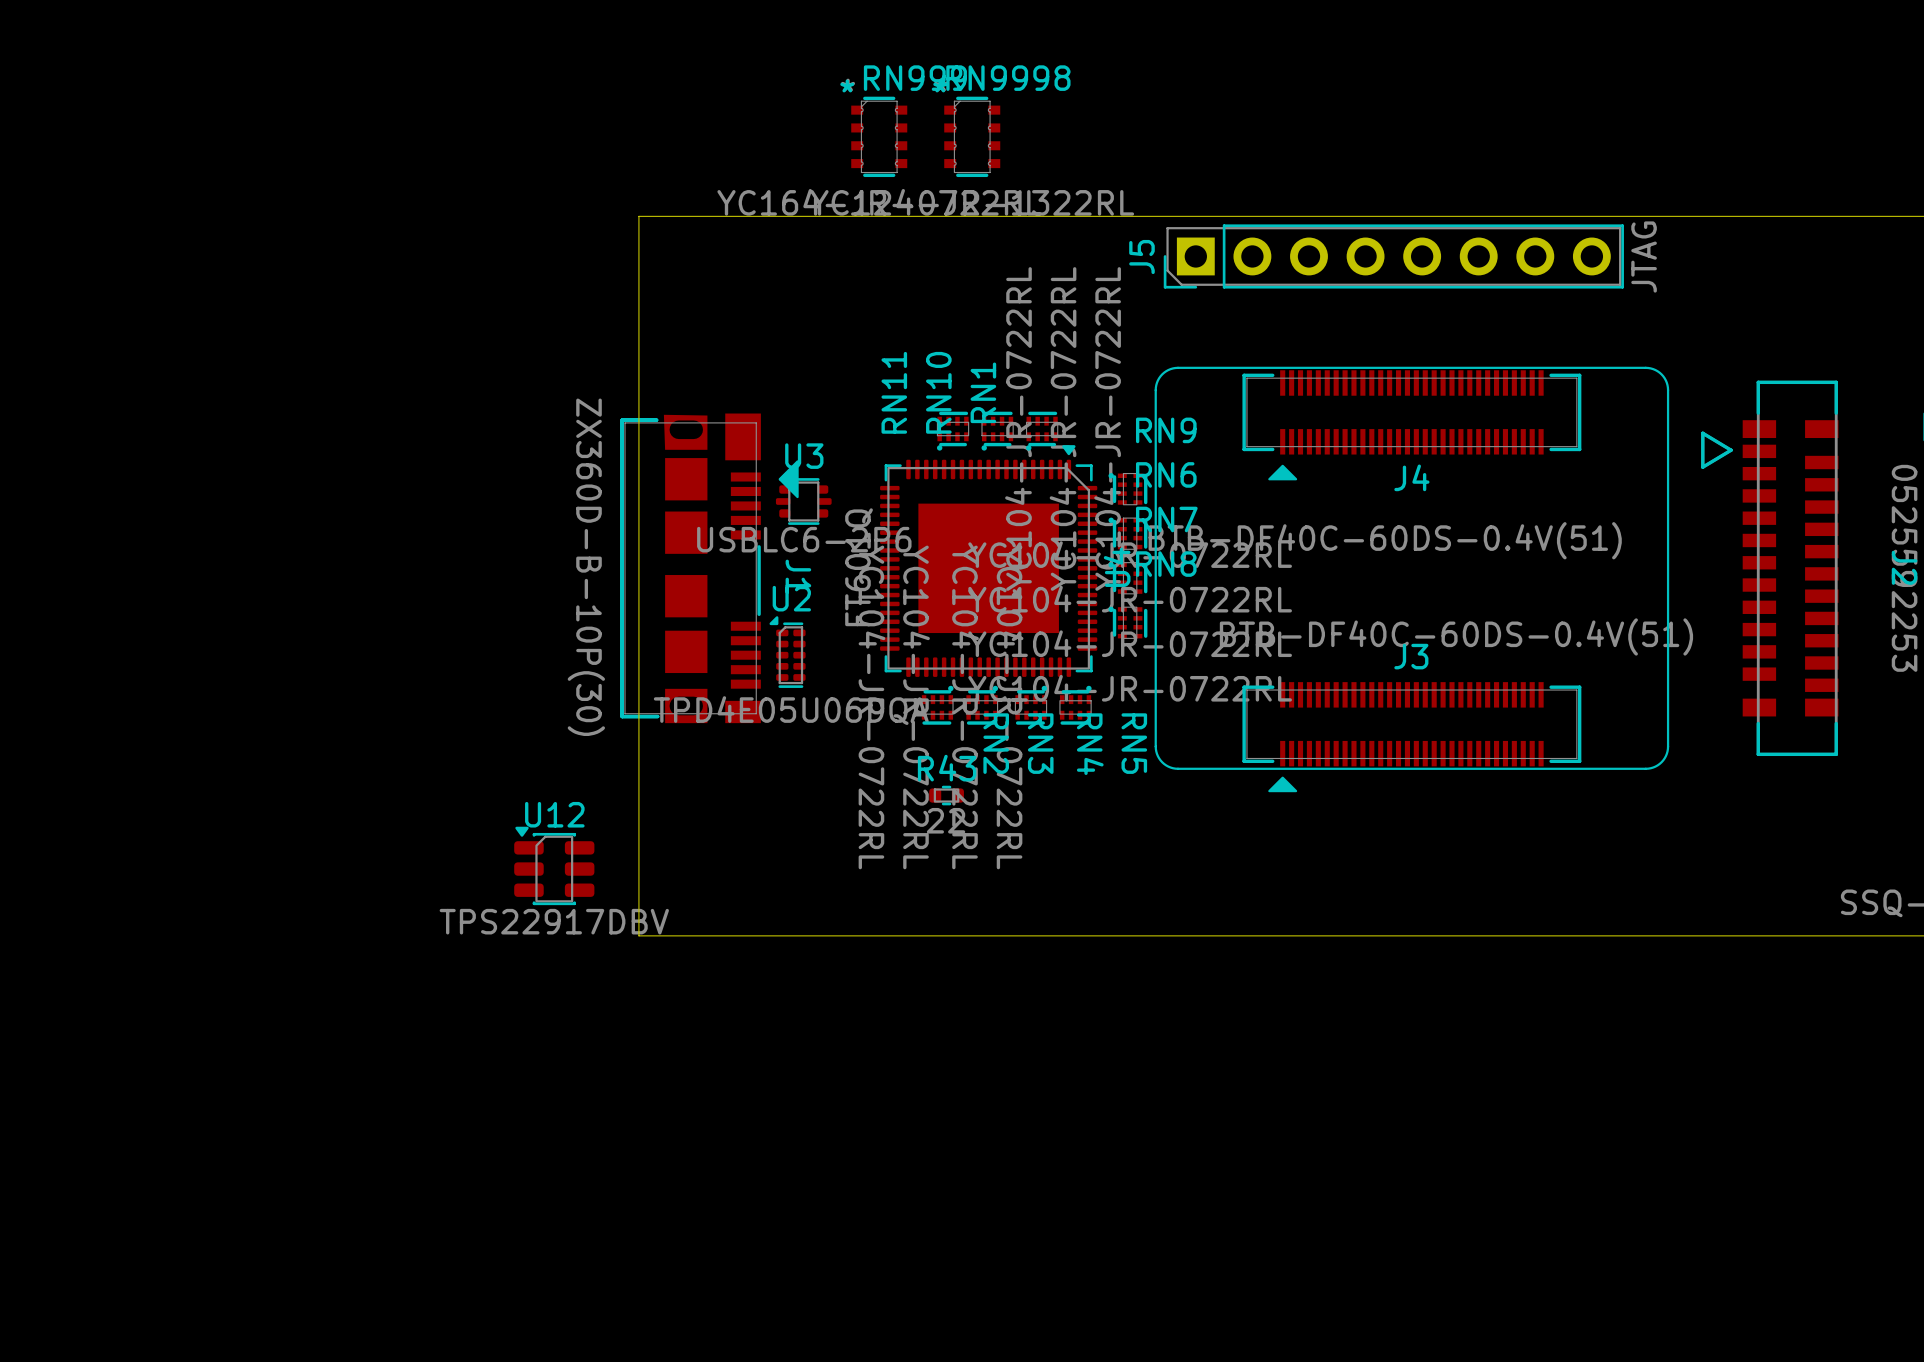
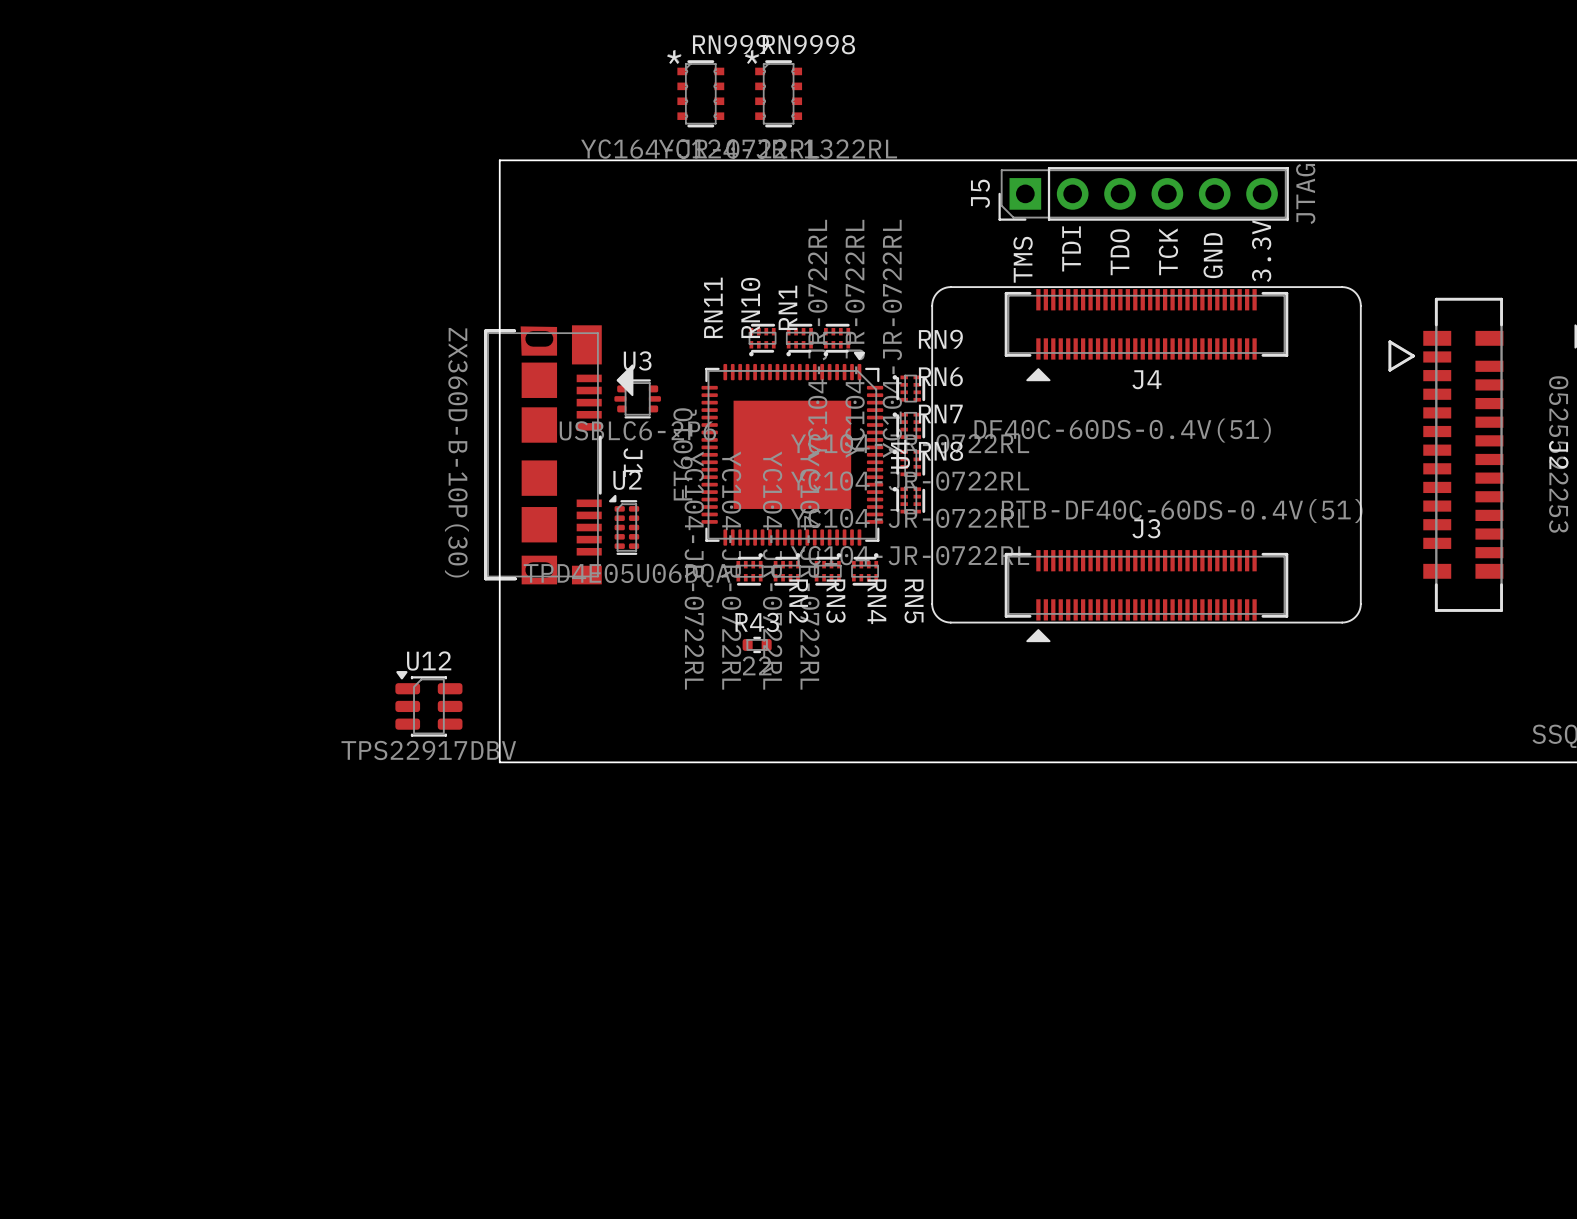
J5 footprint: [1163, 224, 1624, 289] -> [998, 167, 1289, 221]
J5 name position: J5 (1141, 257) -> J5 (980, 193)
J5 value position: JTAG (1644, 257) -> JTAG (1305, 193)
text: none -> TDO (1119, 252)
text: none -> TCK (1168, 251)
text: none -> GND (1213, 255)
text: none -> TDI (1071, 248)
text: none -> 3.3V (1261, 251)
text: none -> TMS (1023, 259)
J4 value: BTB-DF40C-60DS-0.4V(51) (1385, 540) -> DF40C-60DS-0.4V(51) (1122, 430)

